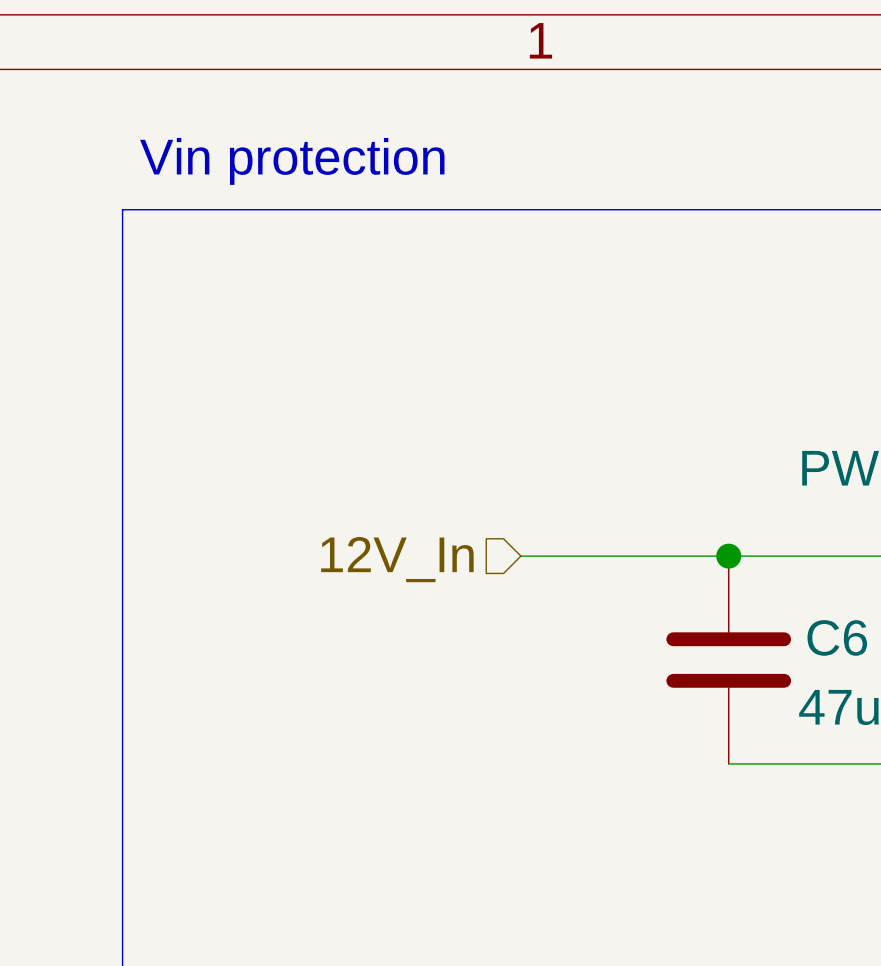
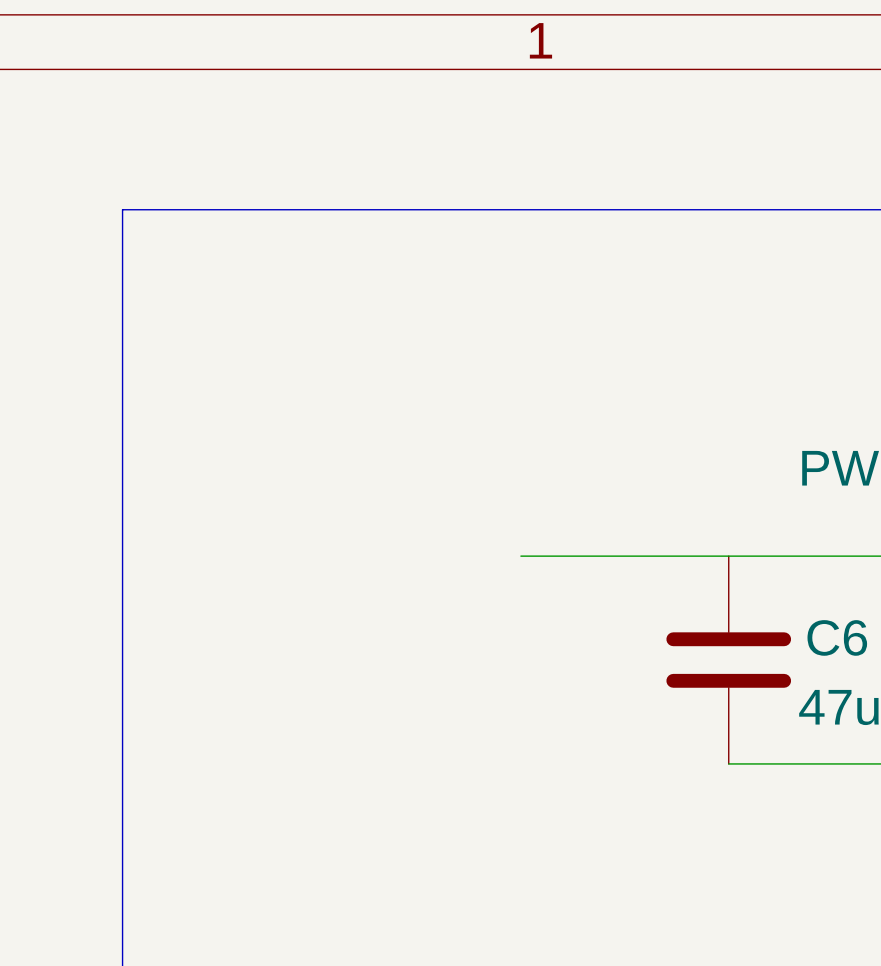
text: Vin protection (292, 161) -> none
junction: (728, 556) -> none
hierarchical label: 12V_In (397, 559) -> none

